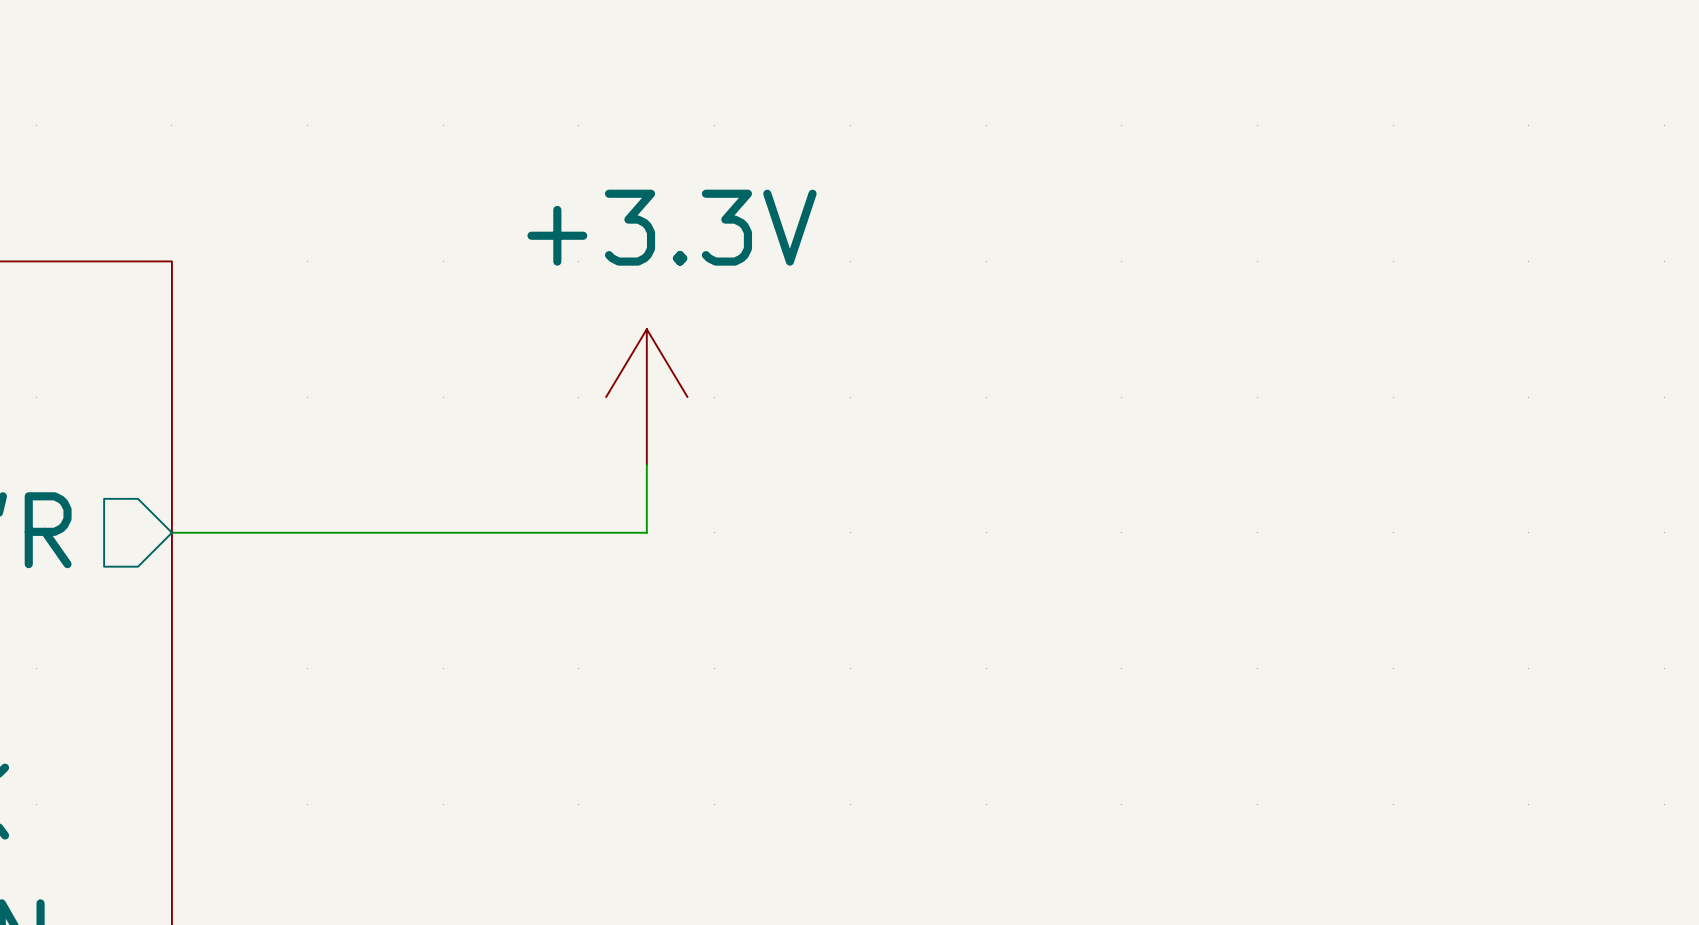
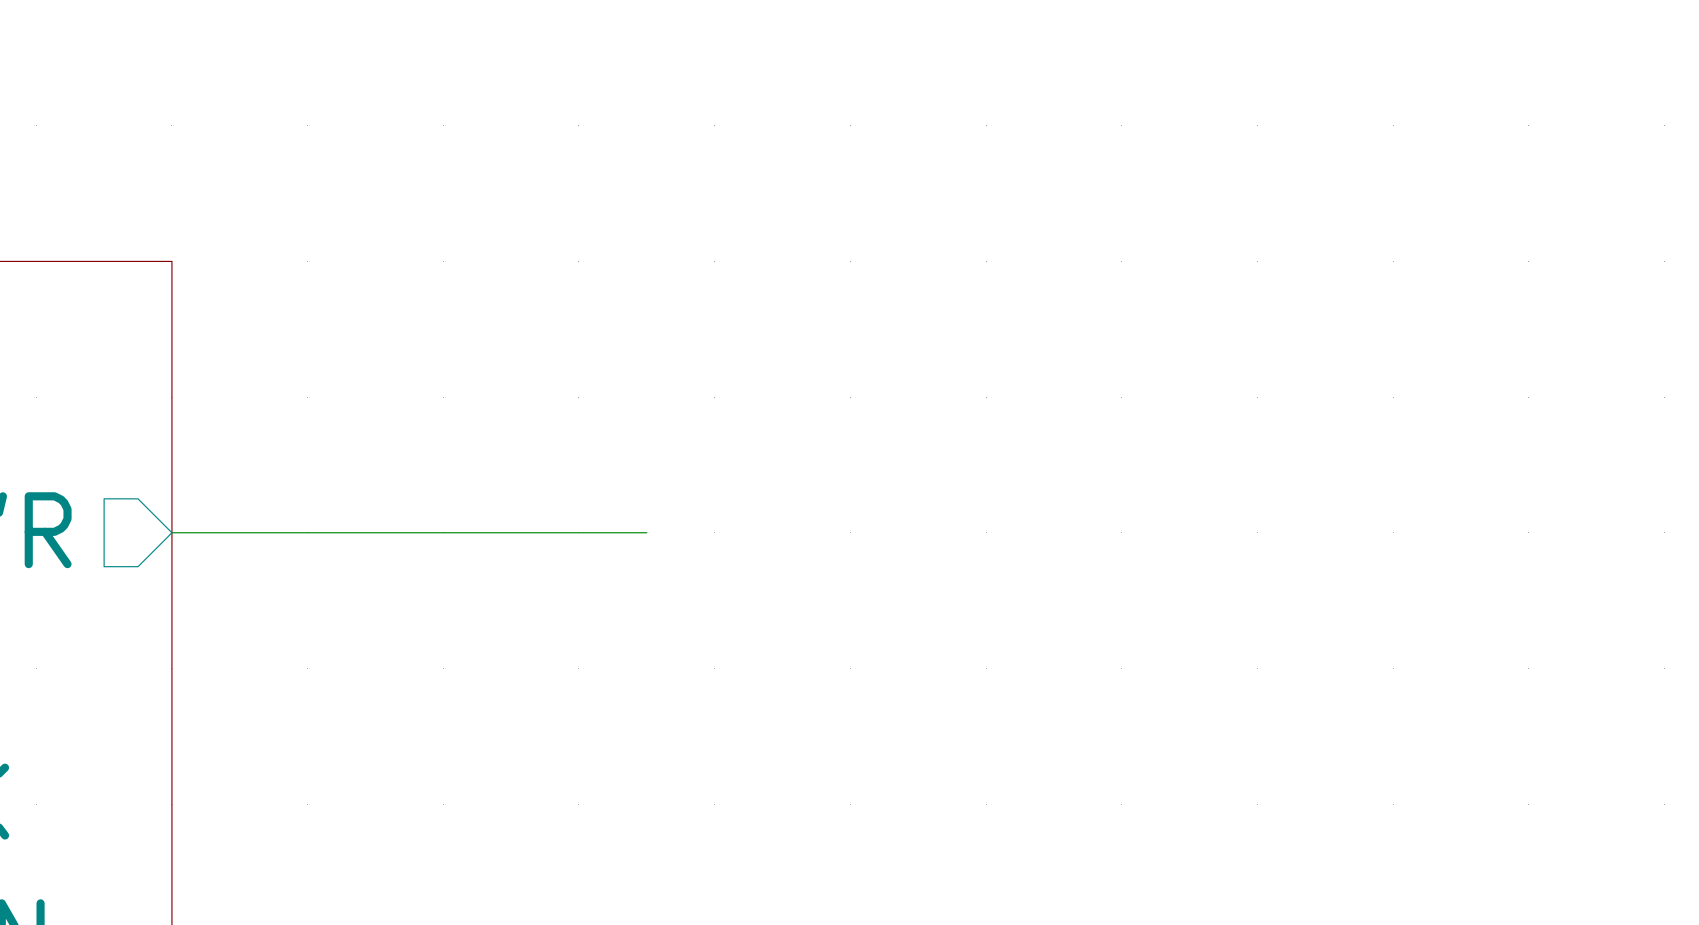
power symbol: +3.3V (646, 397) -> none
wire: (646, 464) (646, 532) -> none

